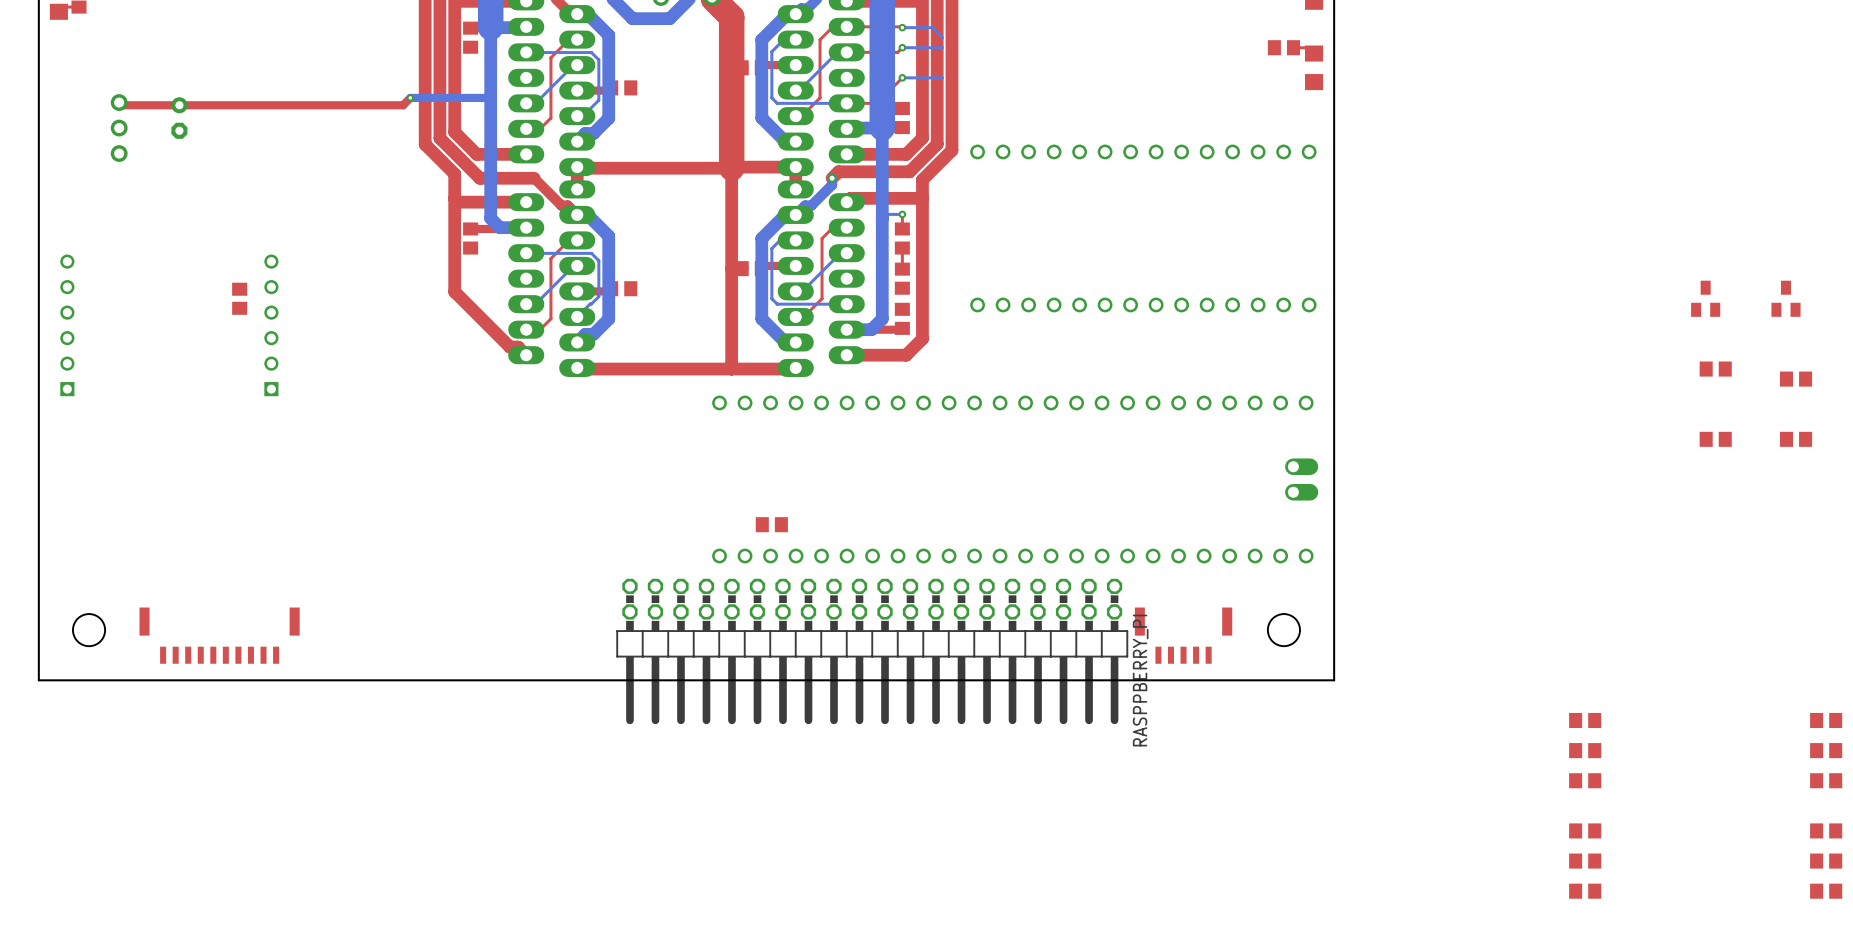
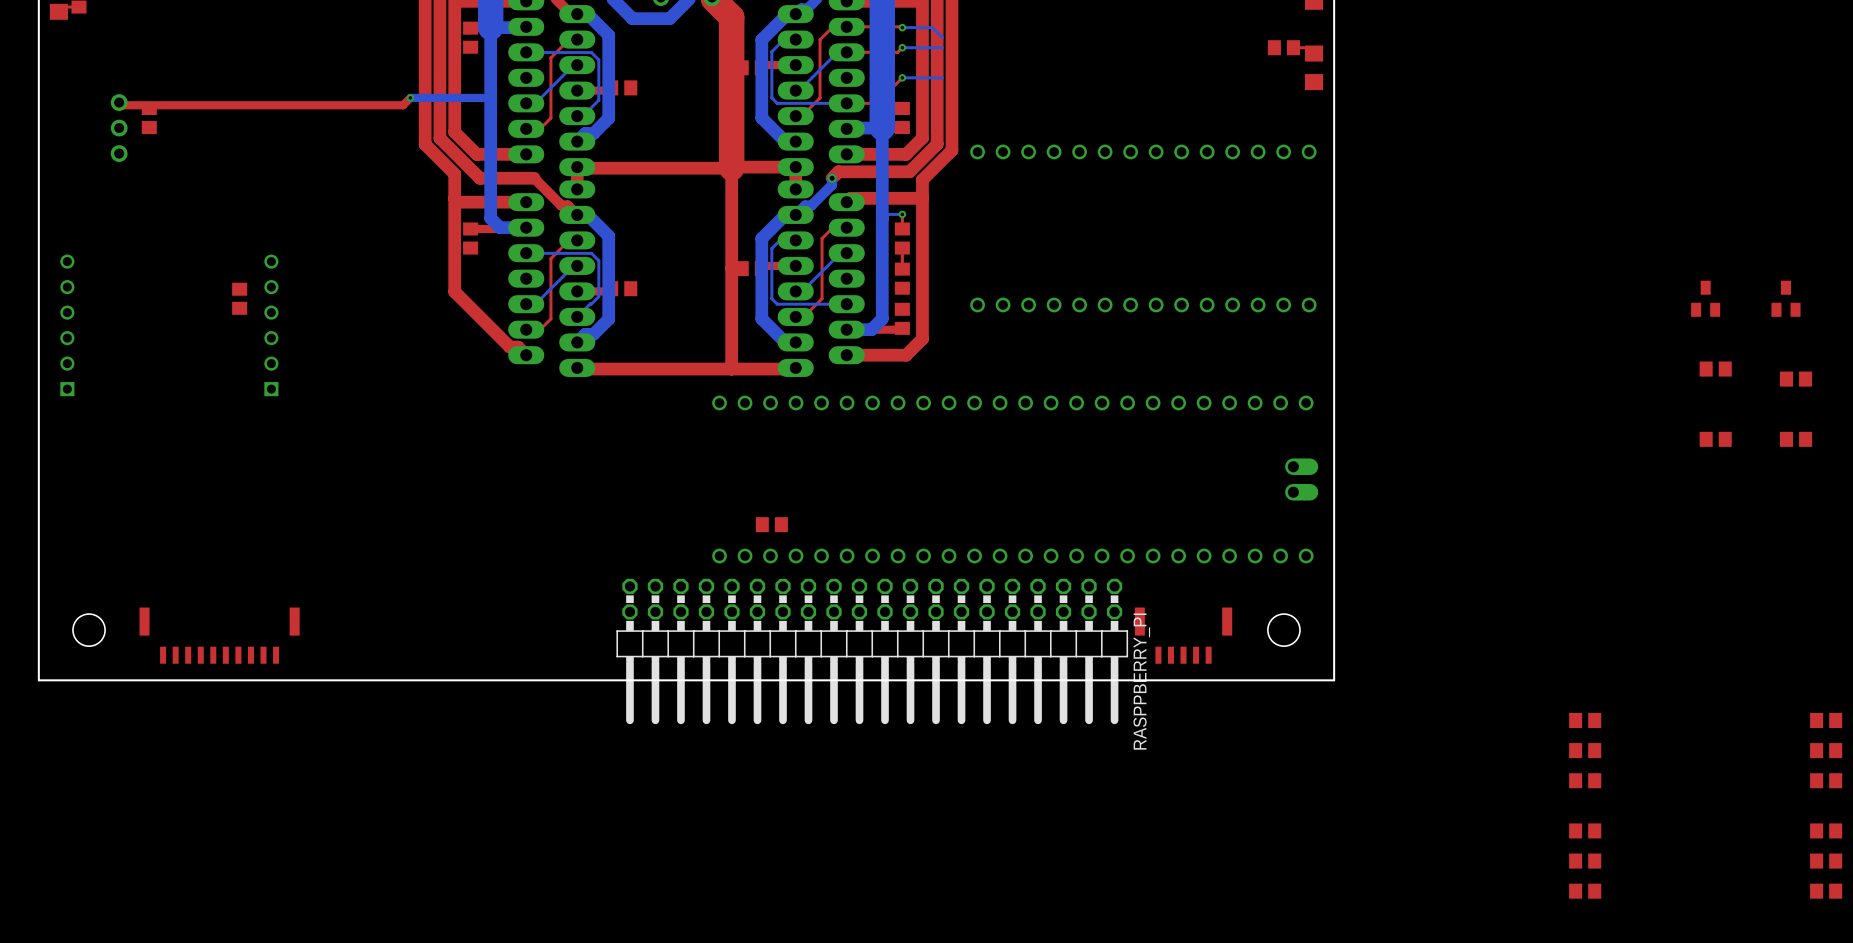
part: none -> (149, 118)
part: (179, 118) -> none

